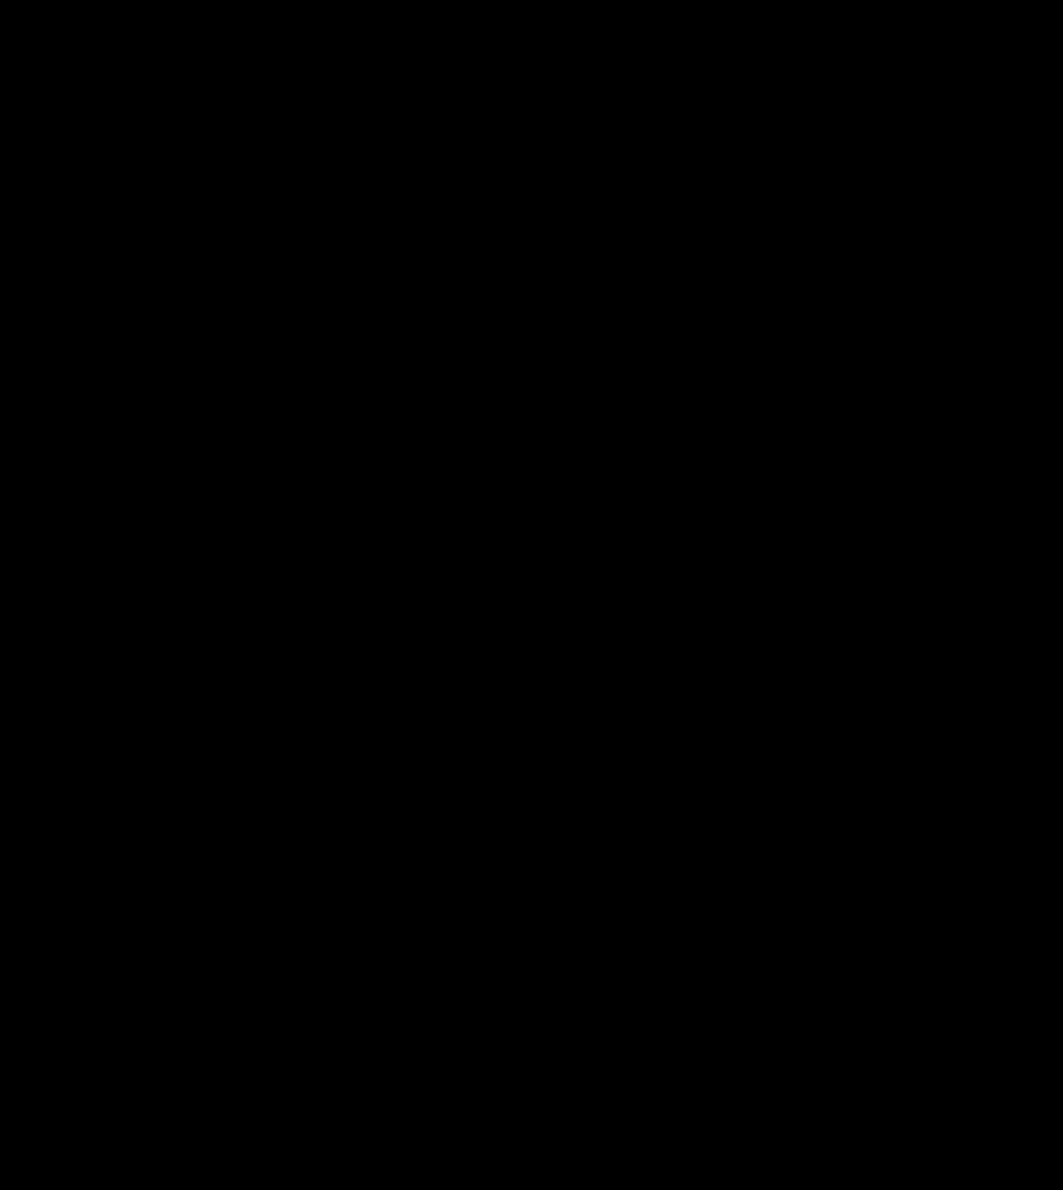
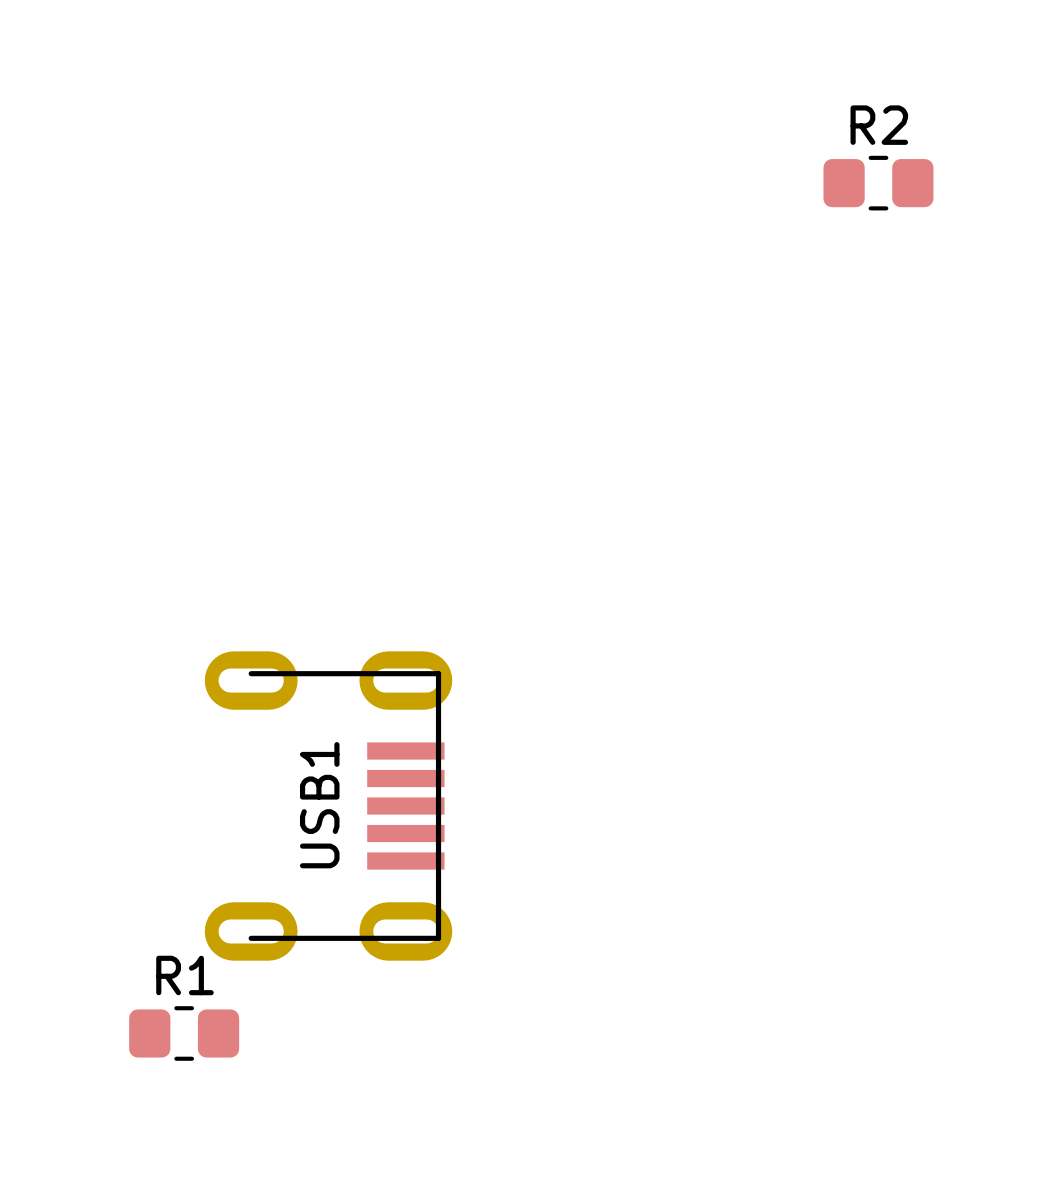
R2: none -> (878, 183)
USB1: none -> (328, 806)
R1: none -> (184, 1033)

